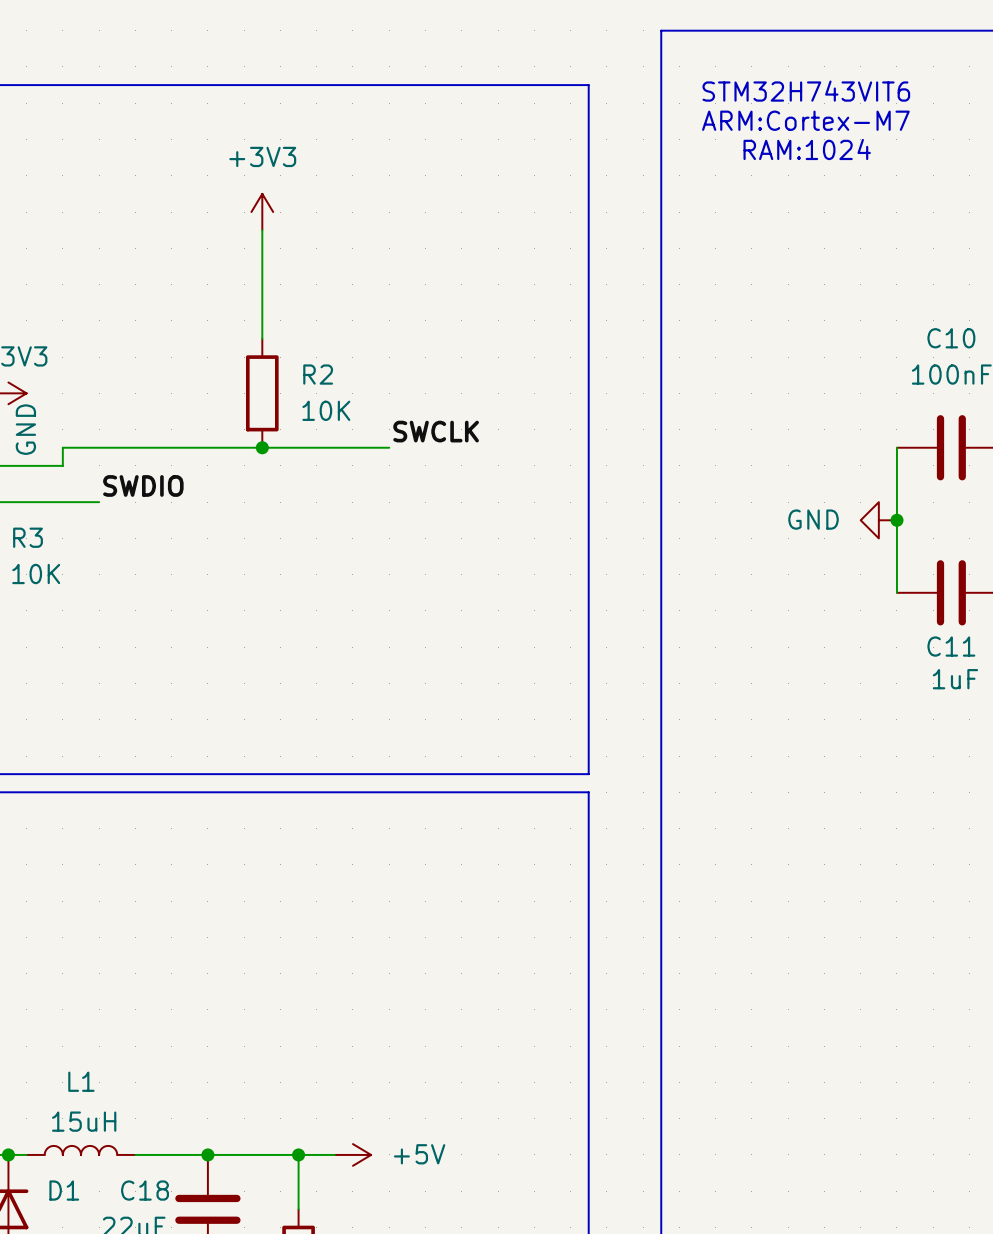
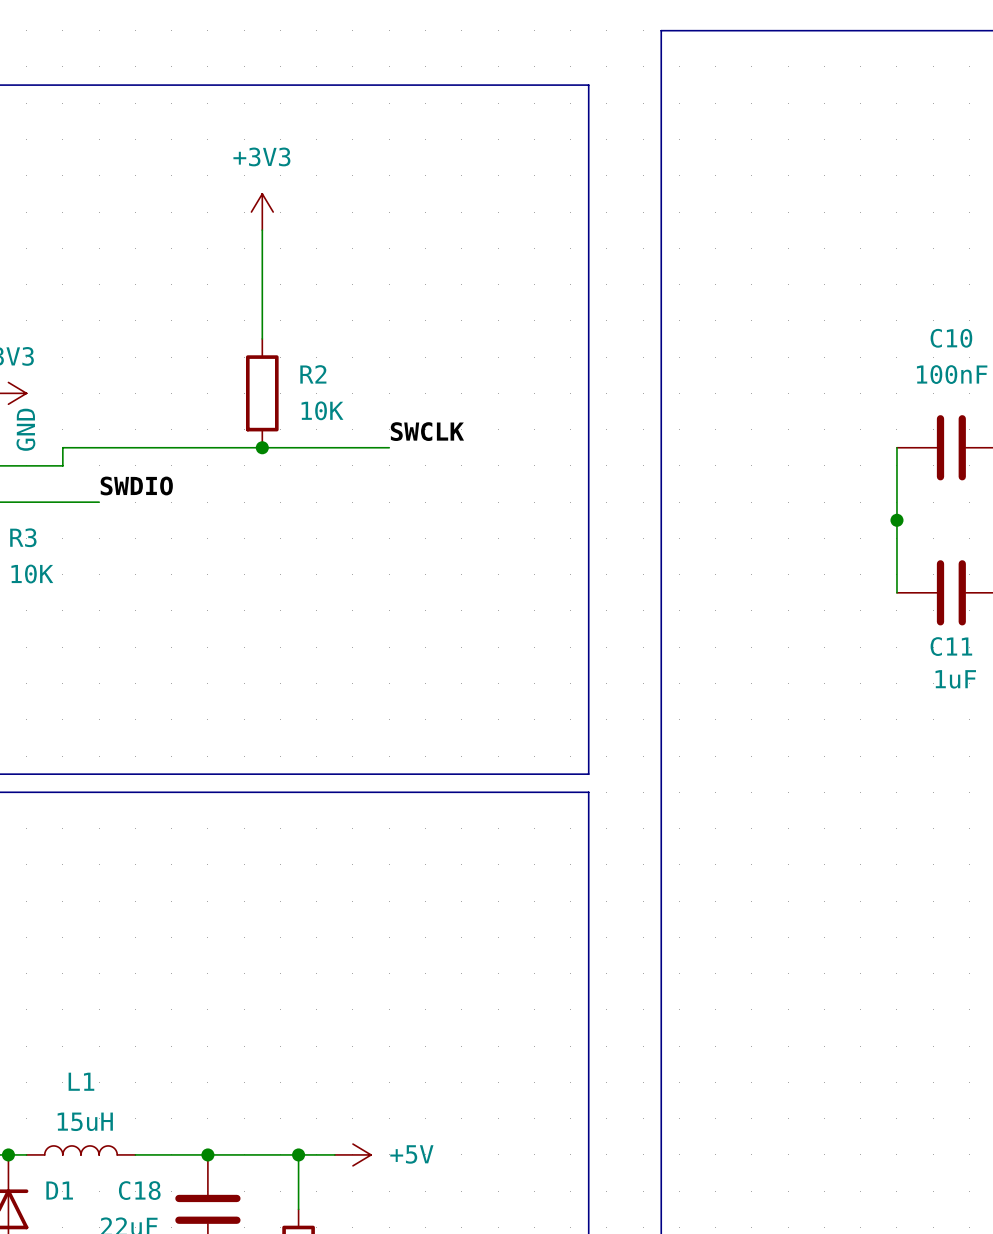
text: STM32H743VIT6 (806, 91) -> none
text: ARM:Cortex-M7 (805, 120) -> none
text: RAM:1024 (807, 149) -> none
power symbol: GND (878, 520) -> none

